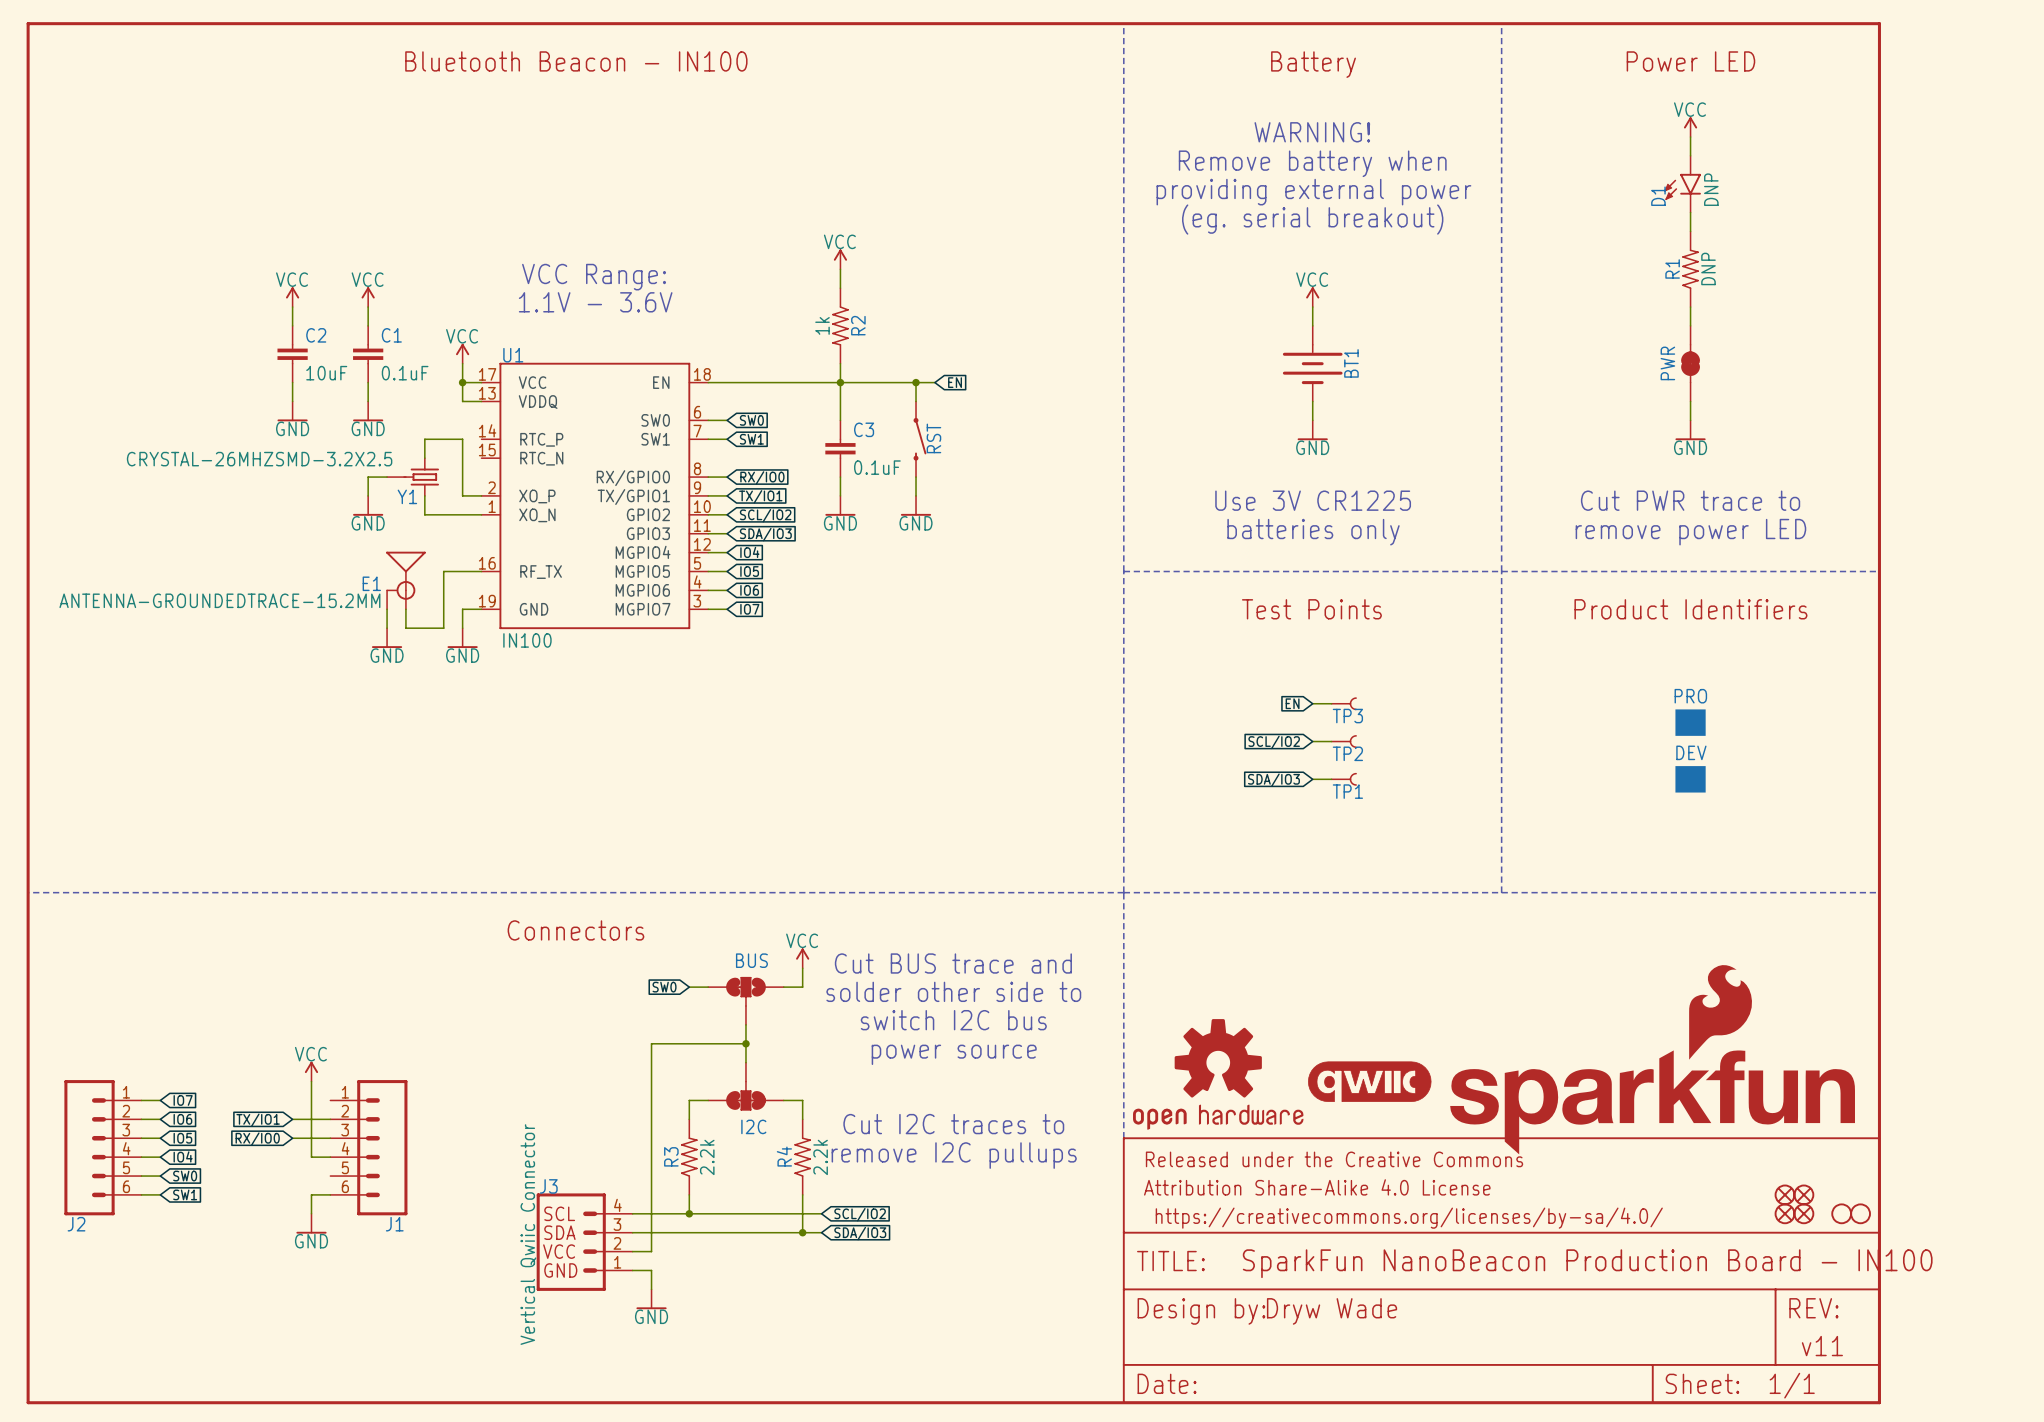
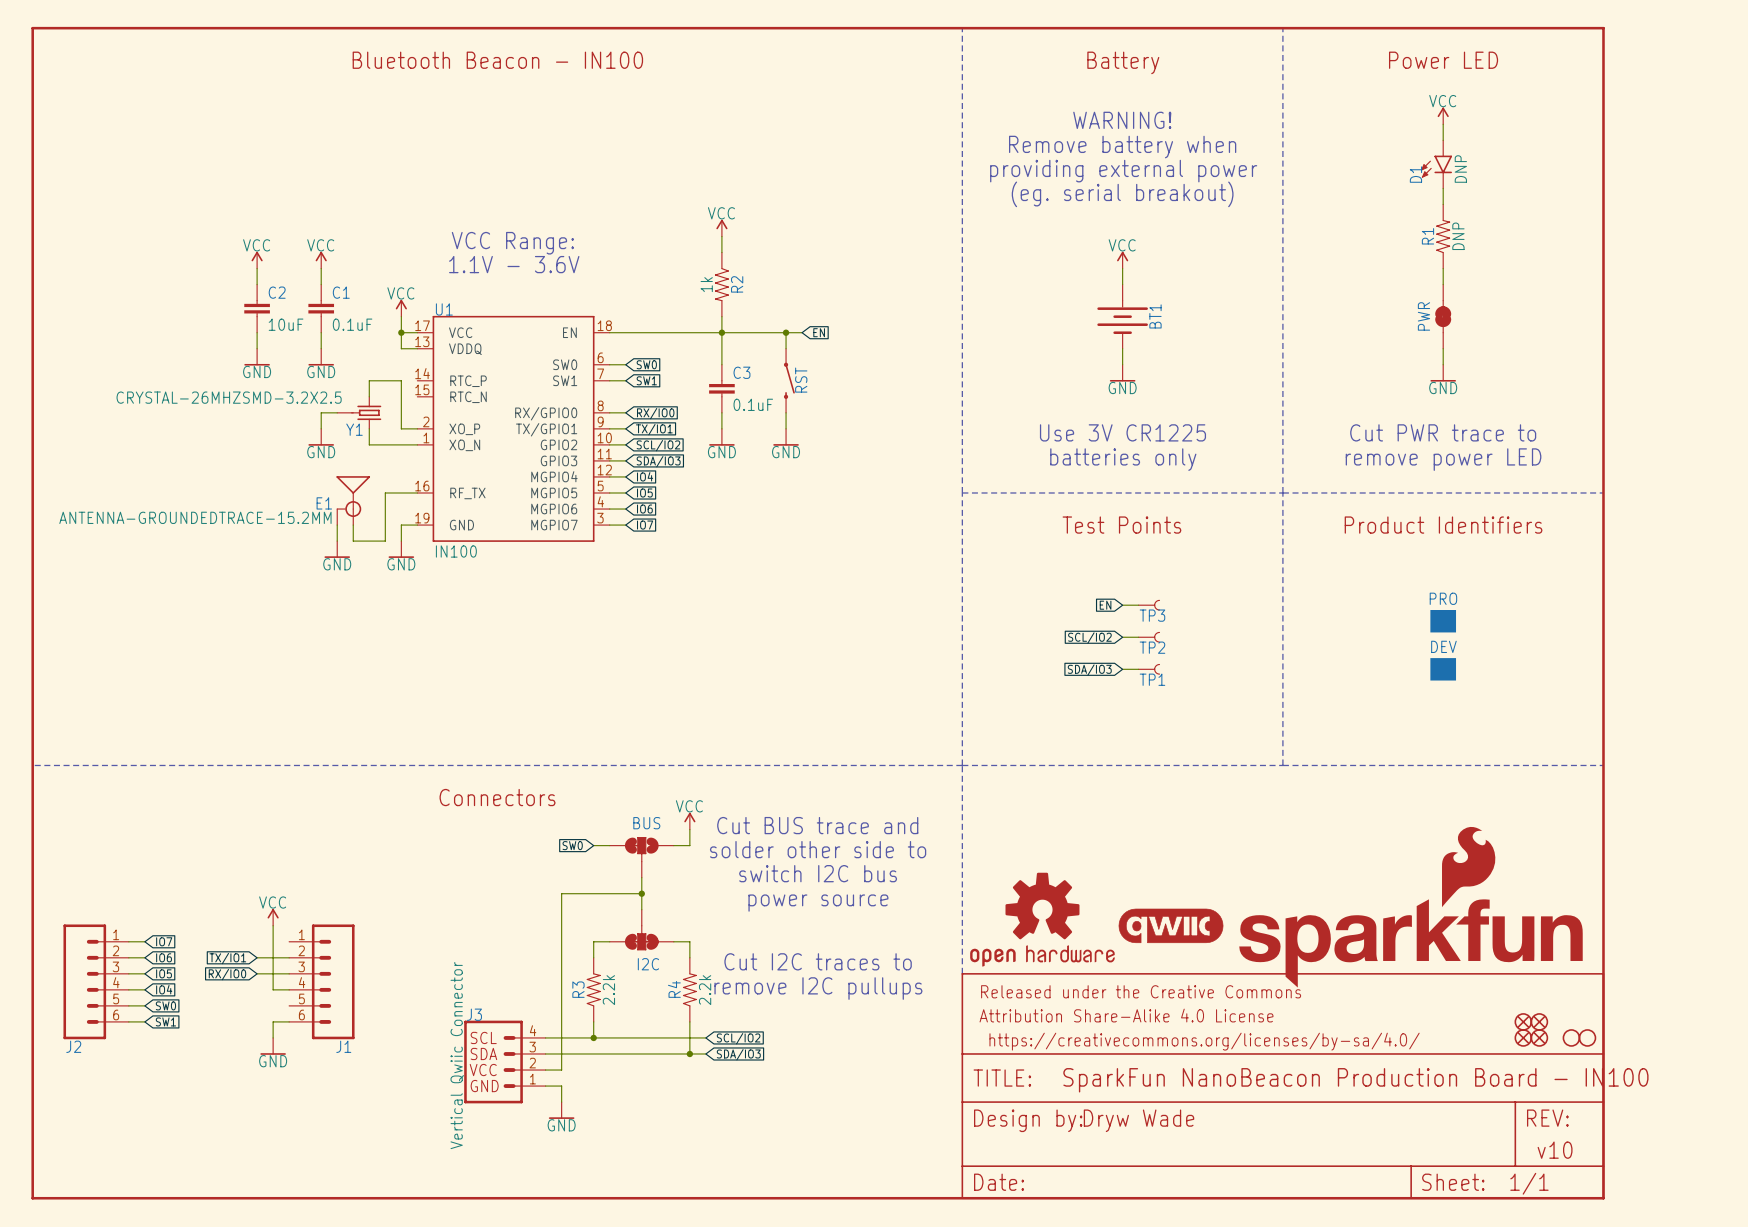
text: v11 (1822, 1346) -> v10 (1555, 1150)

